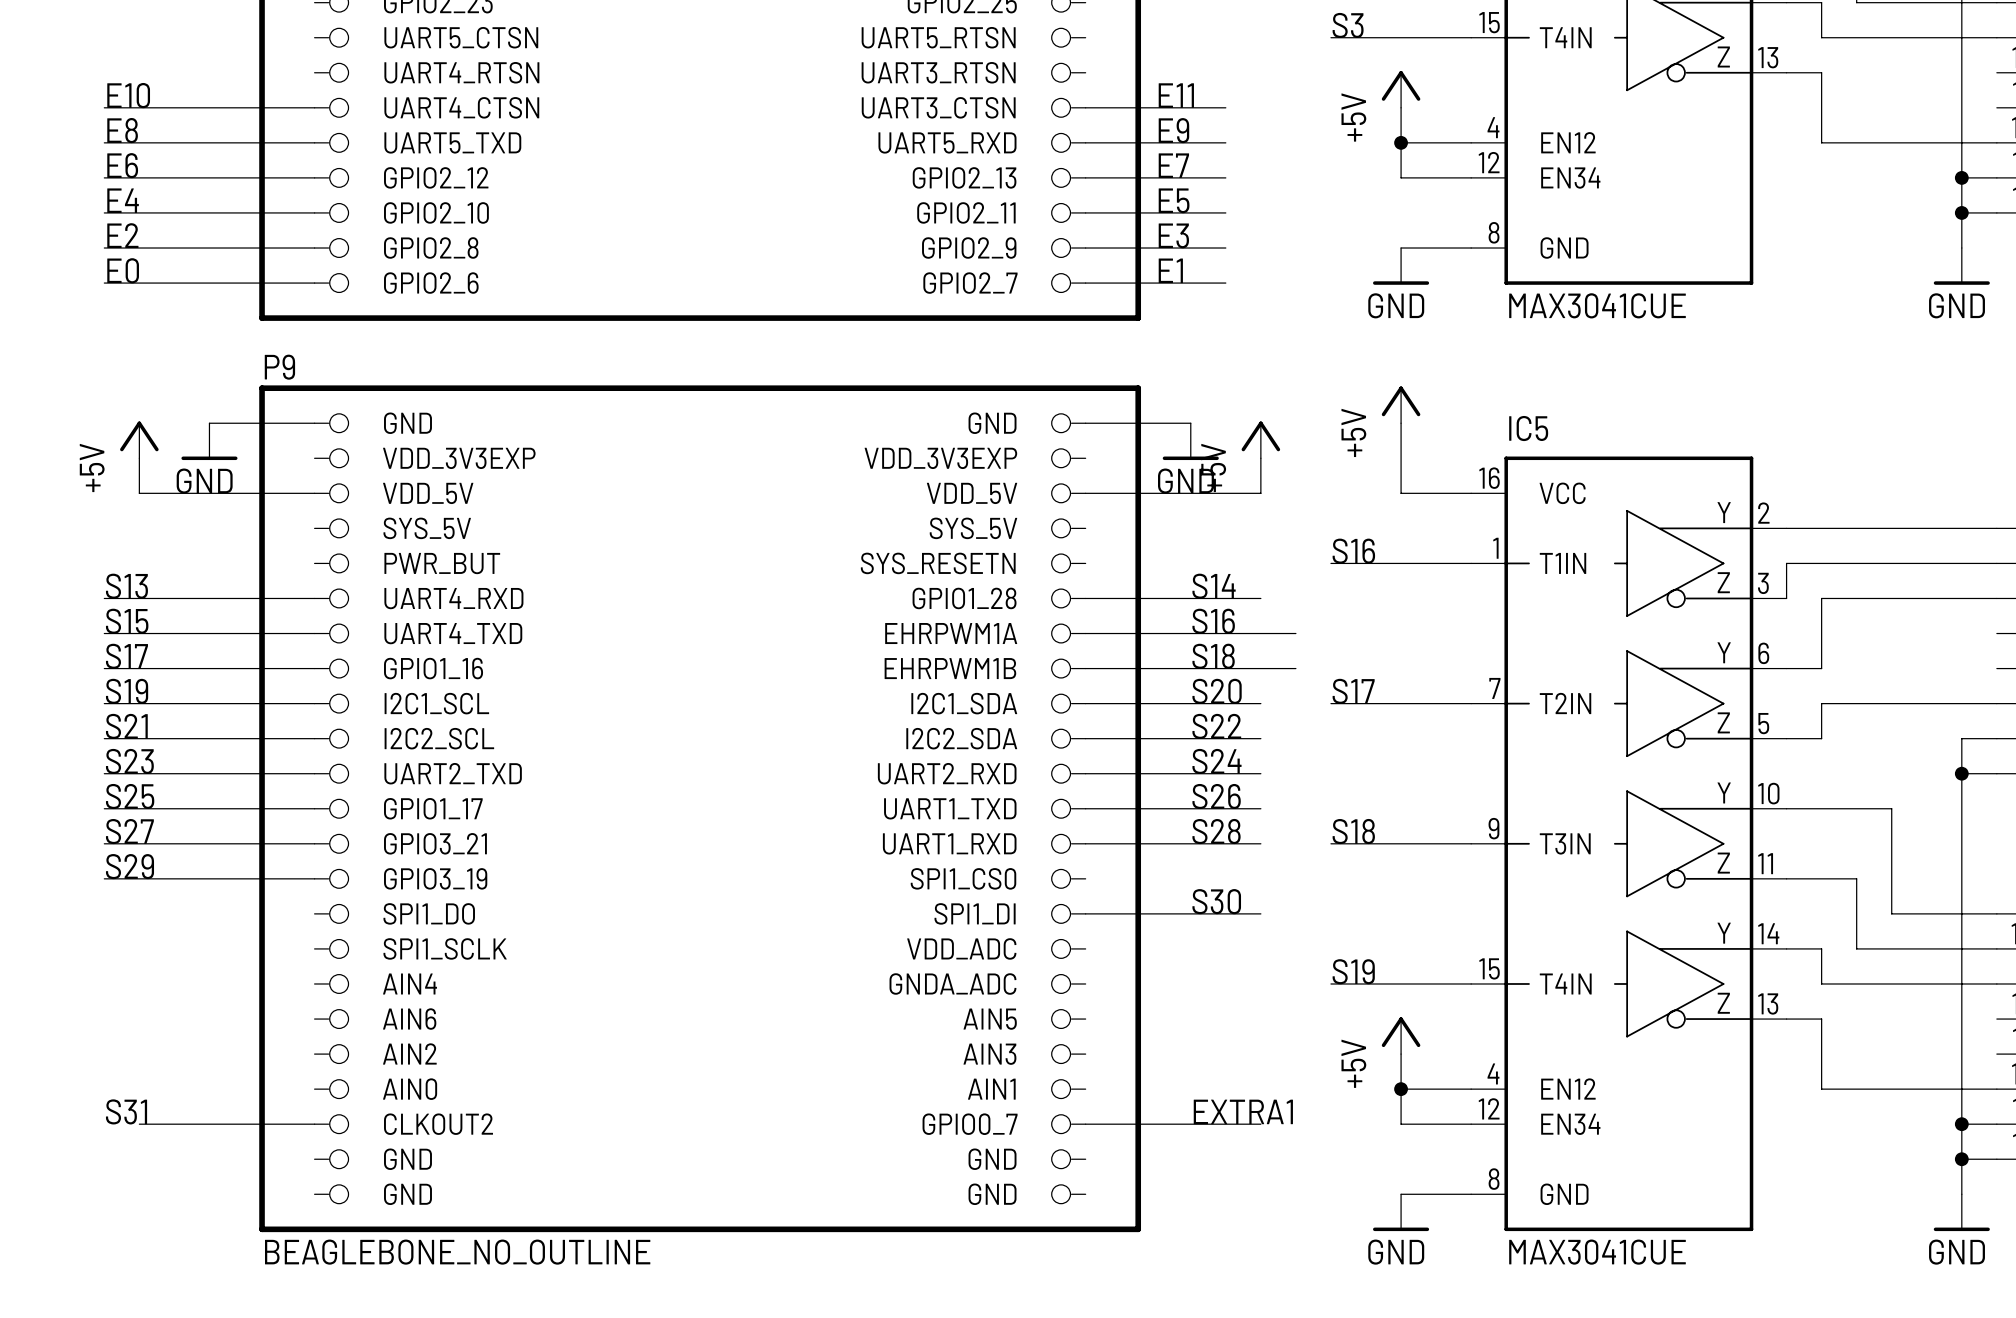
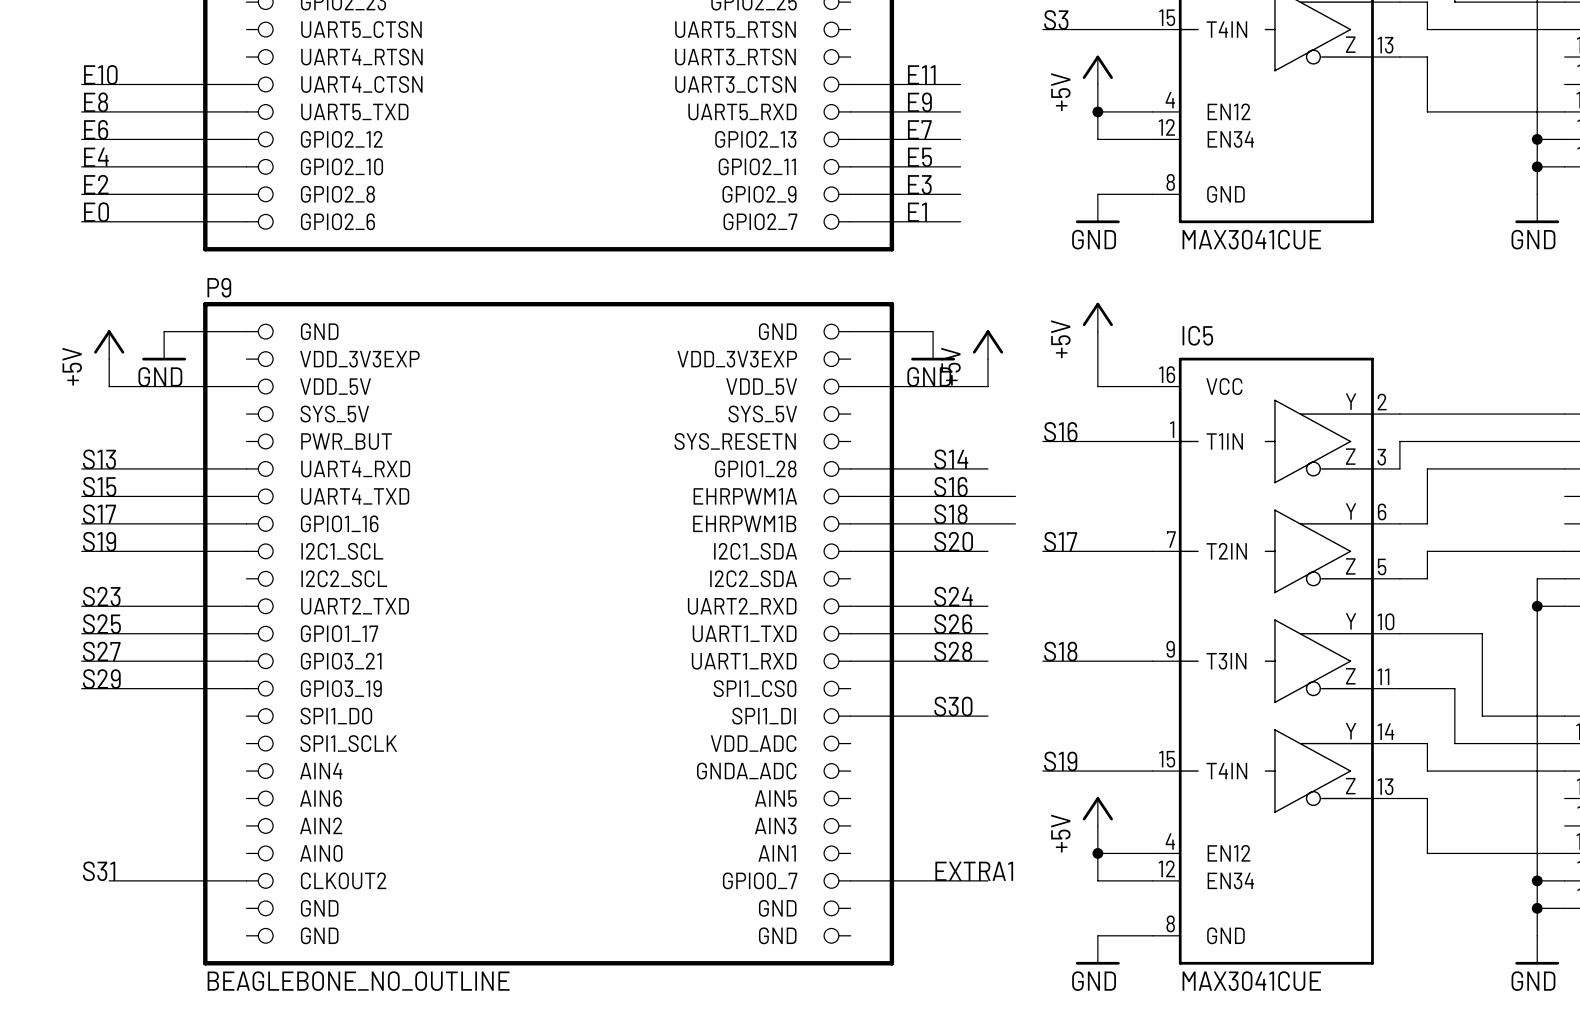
label: S21 (126, 726) -> none
label: S22 (1216, 726) -> none
wire: (104, 738) (314, 738) -> none
wire: (1085, 738) (1260, 738) -> none

